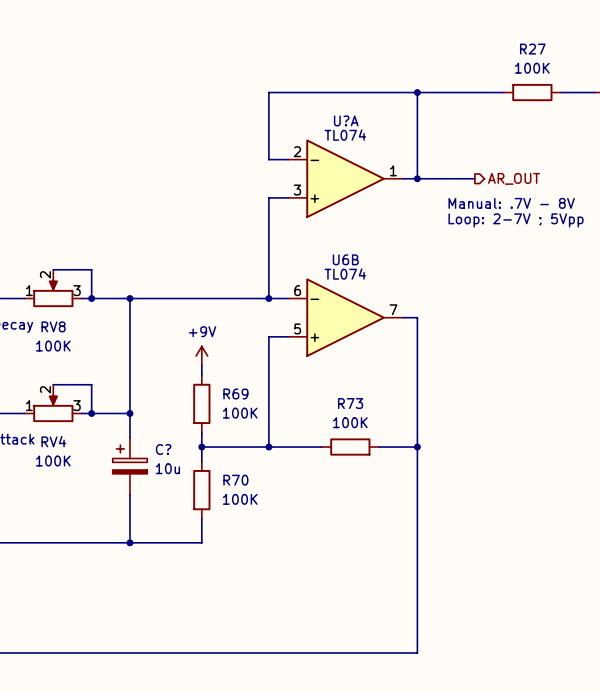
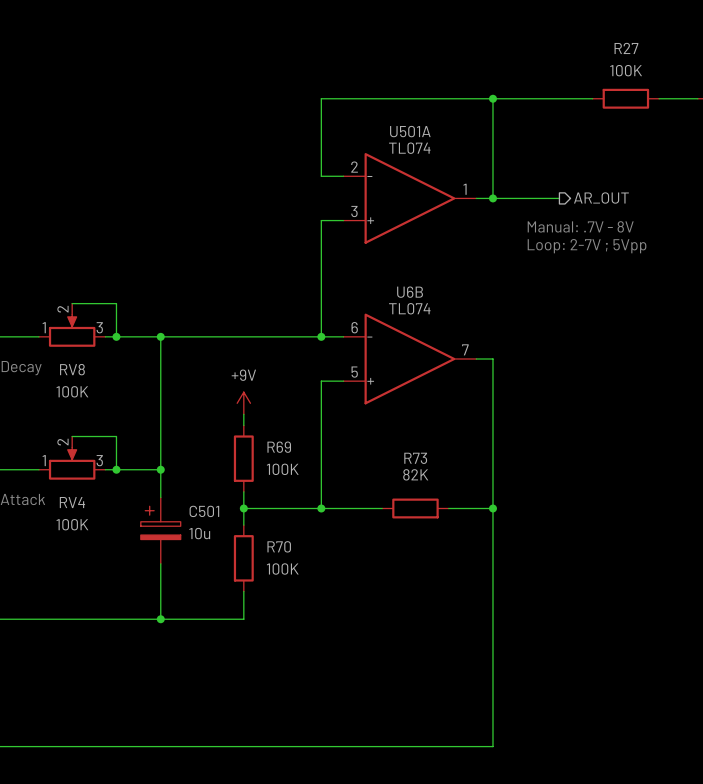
U?A name: U?A (346, 120) -> U501A (410, 131)
R73 value: 100K (350, 422) -> 82K (415, 474)
C? name: C? (163, 449) -> C501 (204, 511)

